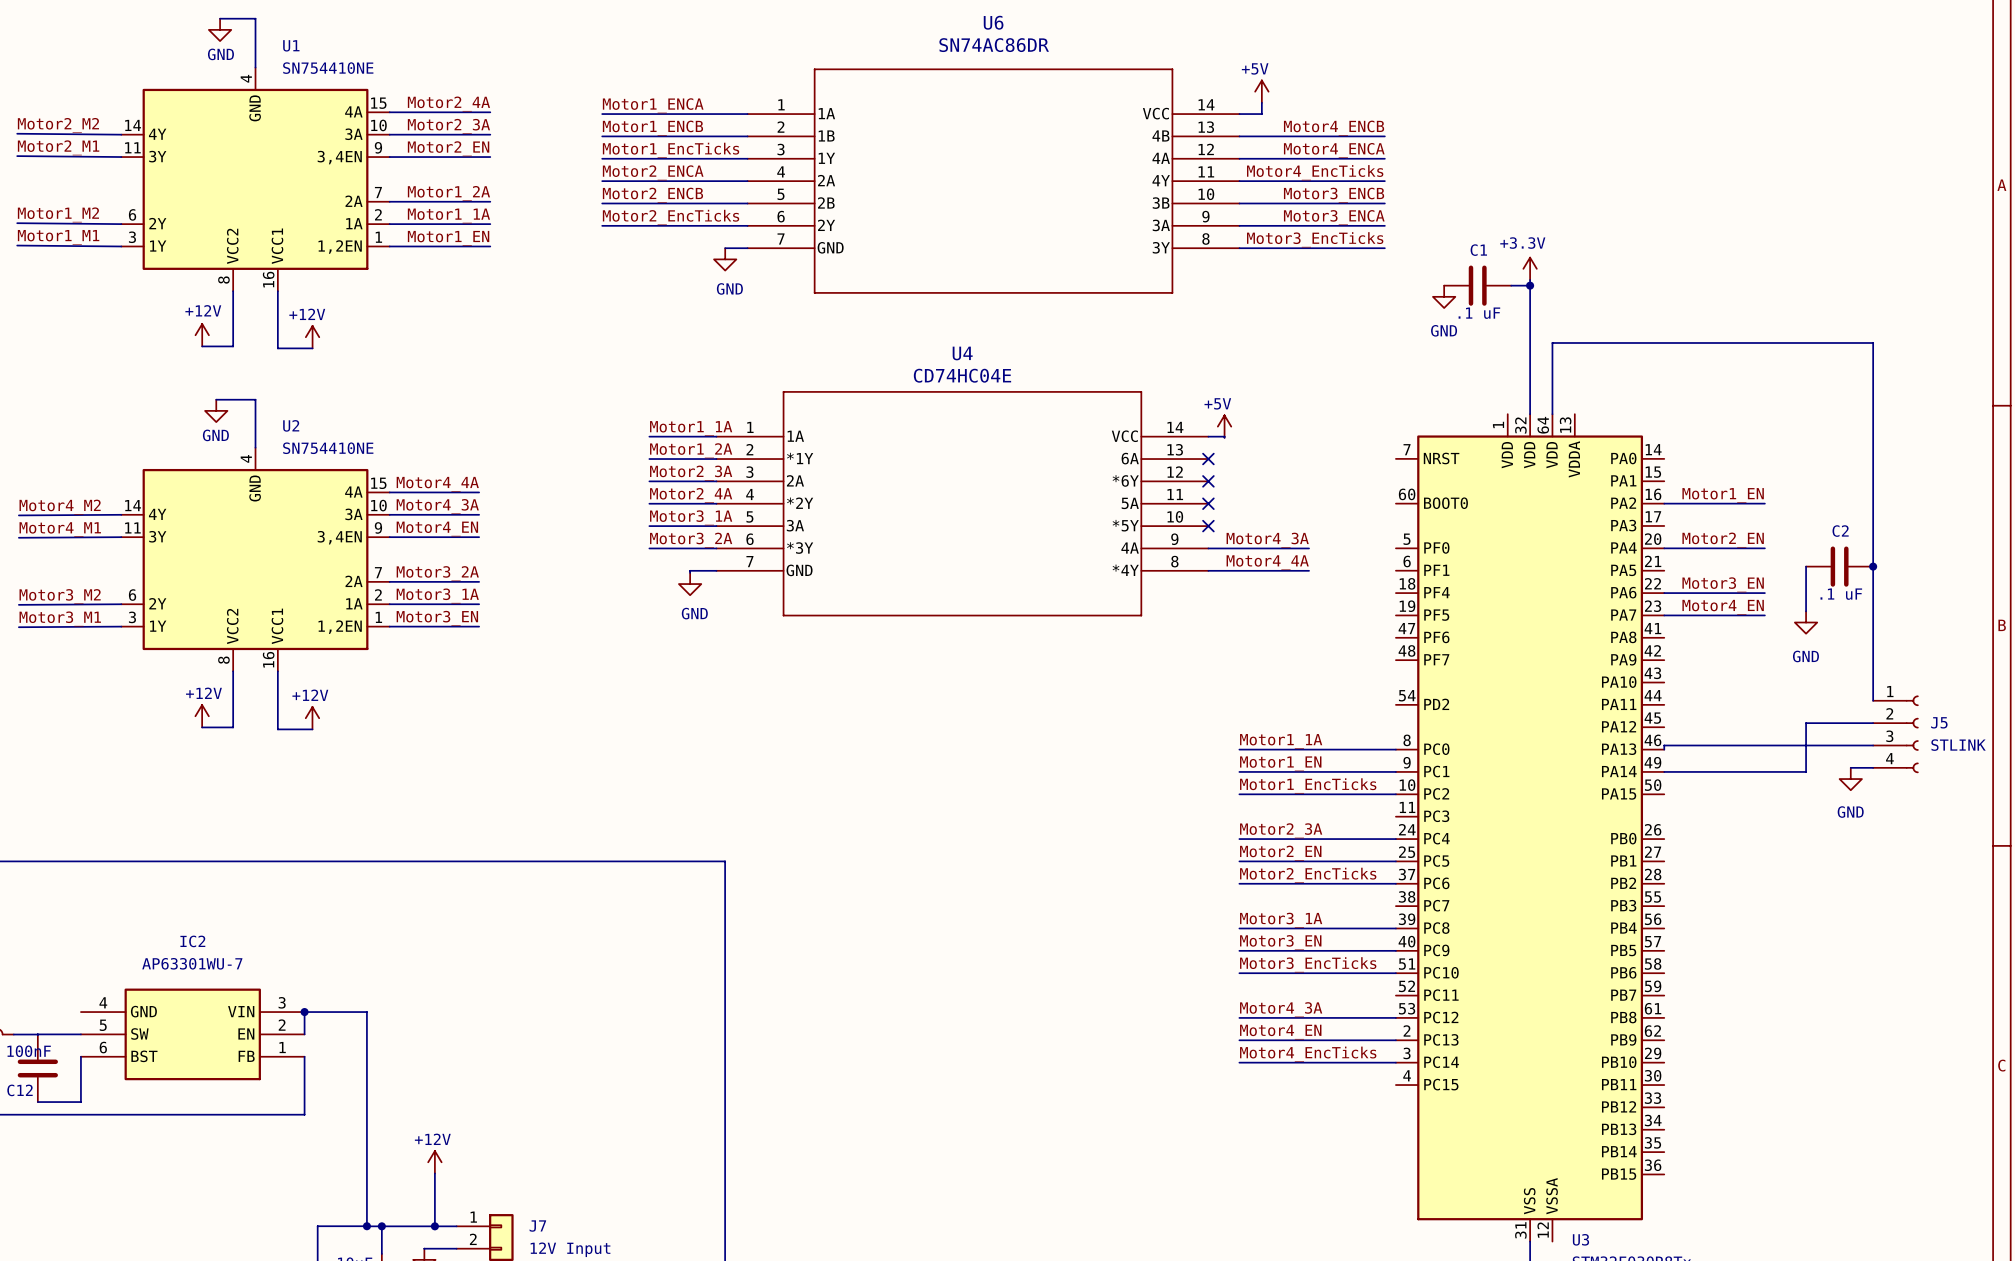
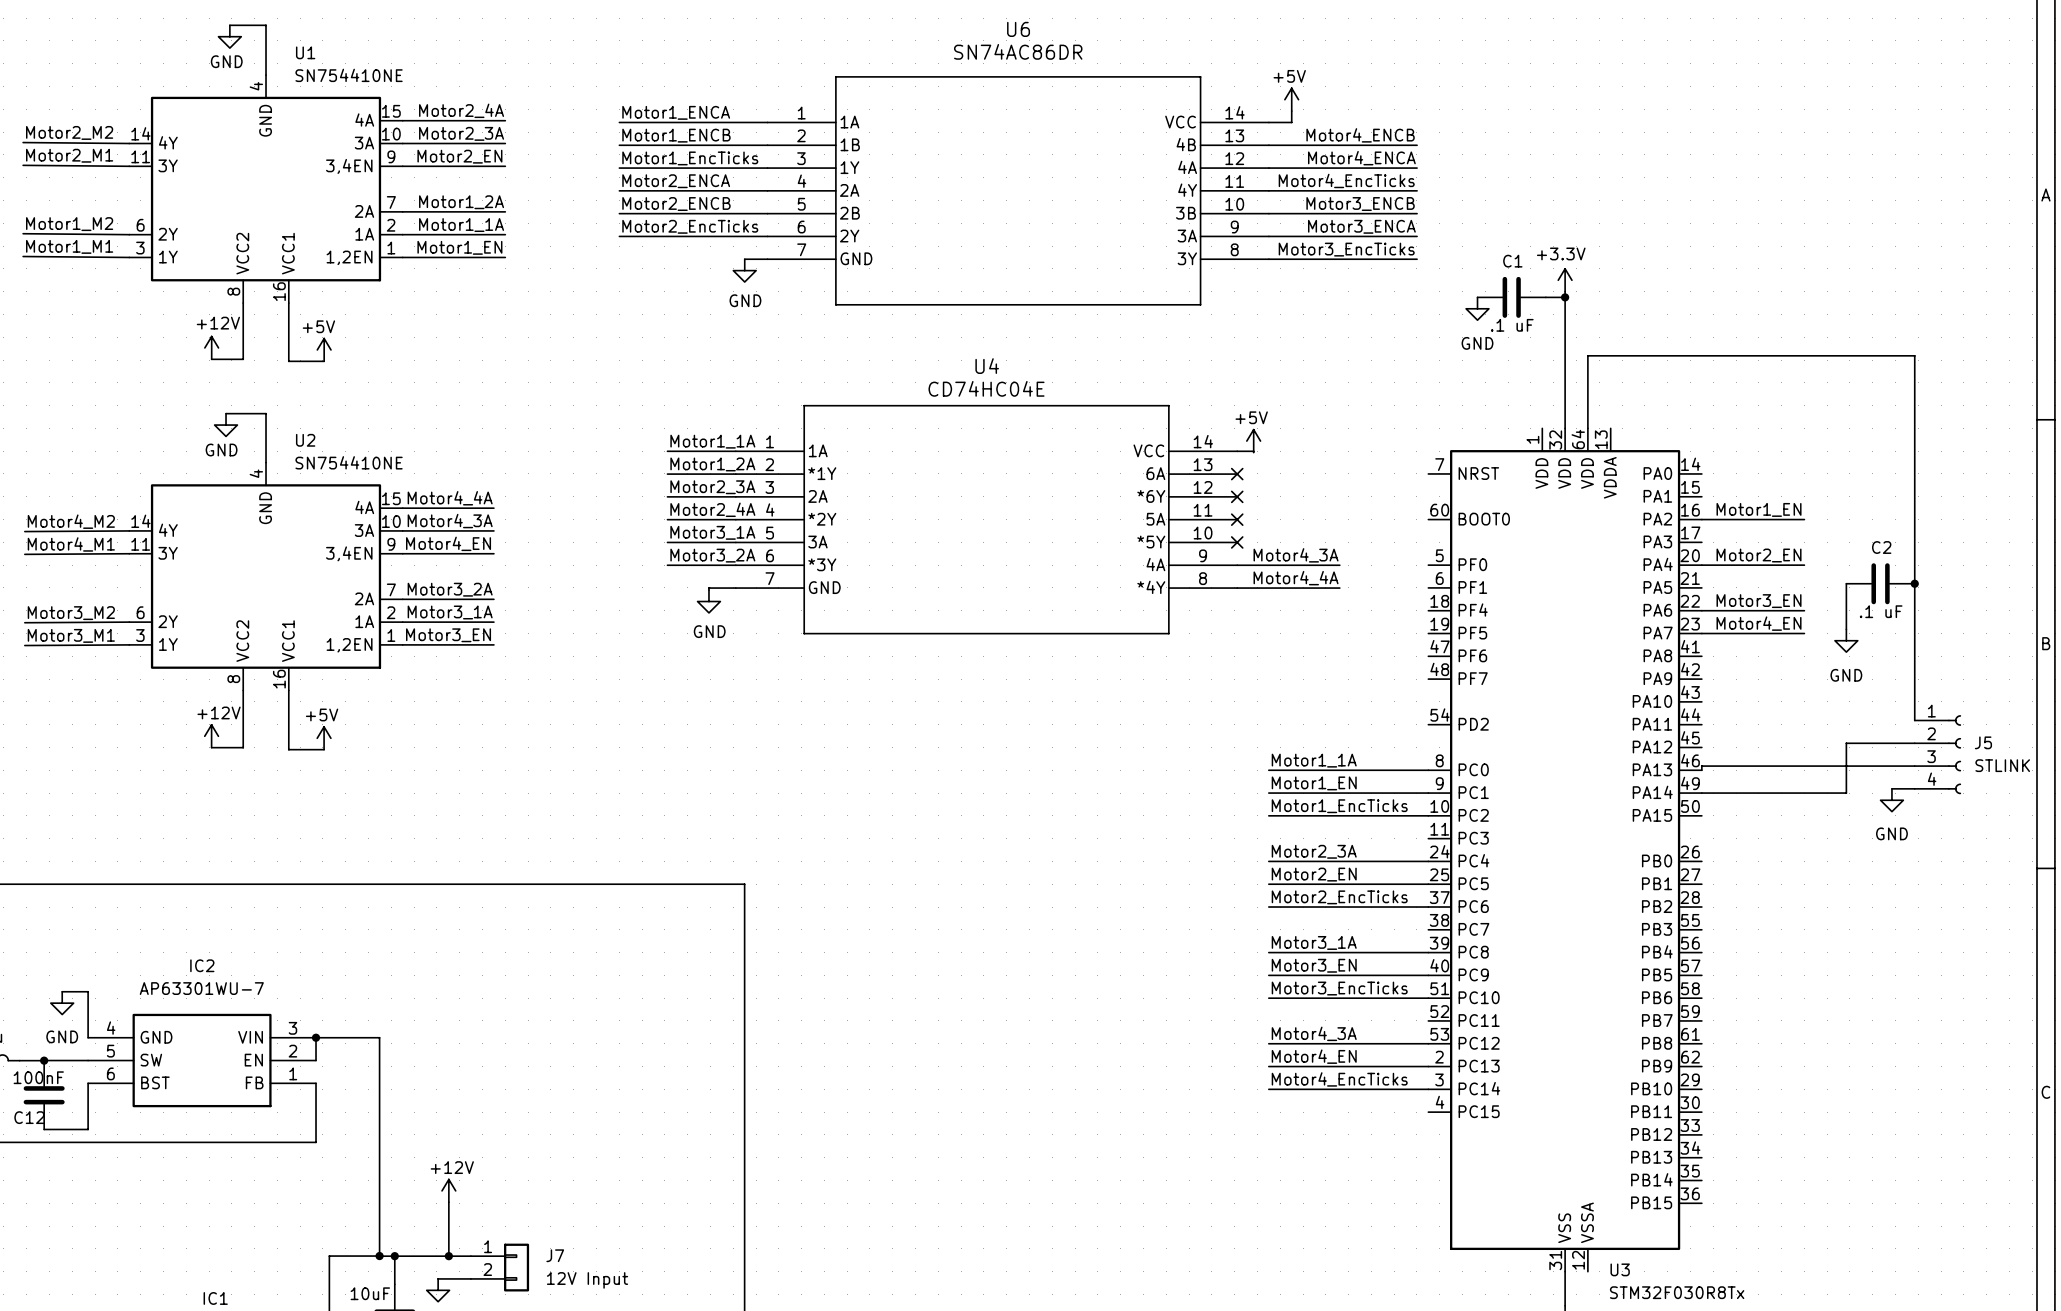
power symbol: +12V (312, 337) -> +5V (324, 349)
power symbol: +12V (312, 718) -> +5V (324, 738)
wire: none -> (62, 991) (88, 991) (88, 1037)
power symbol: none -> GND (62, 1003)
junction: none -> (44, 1060)

